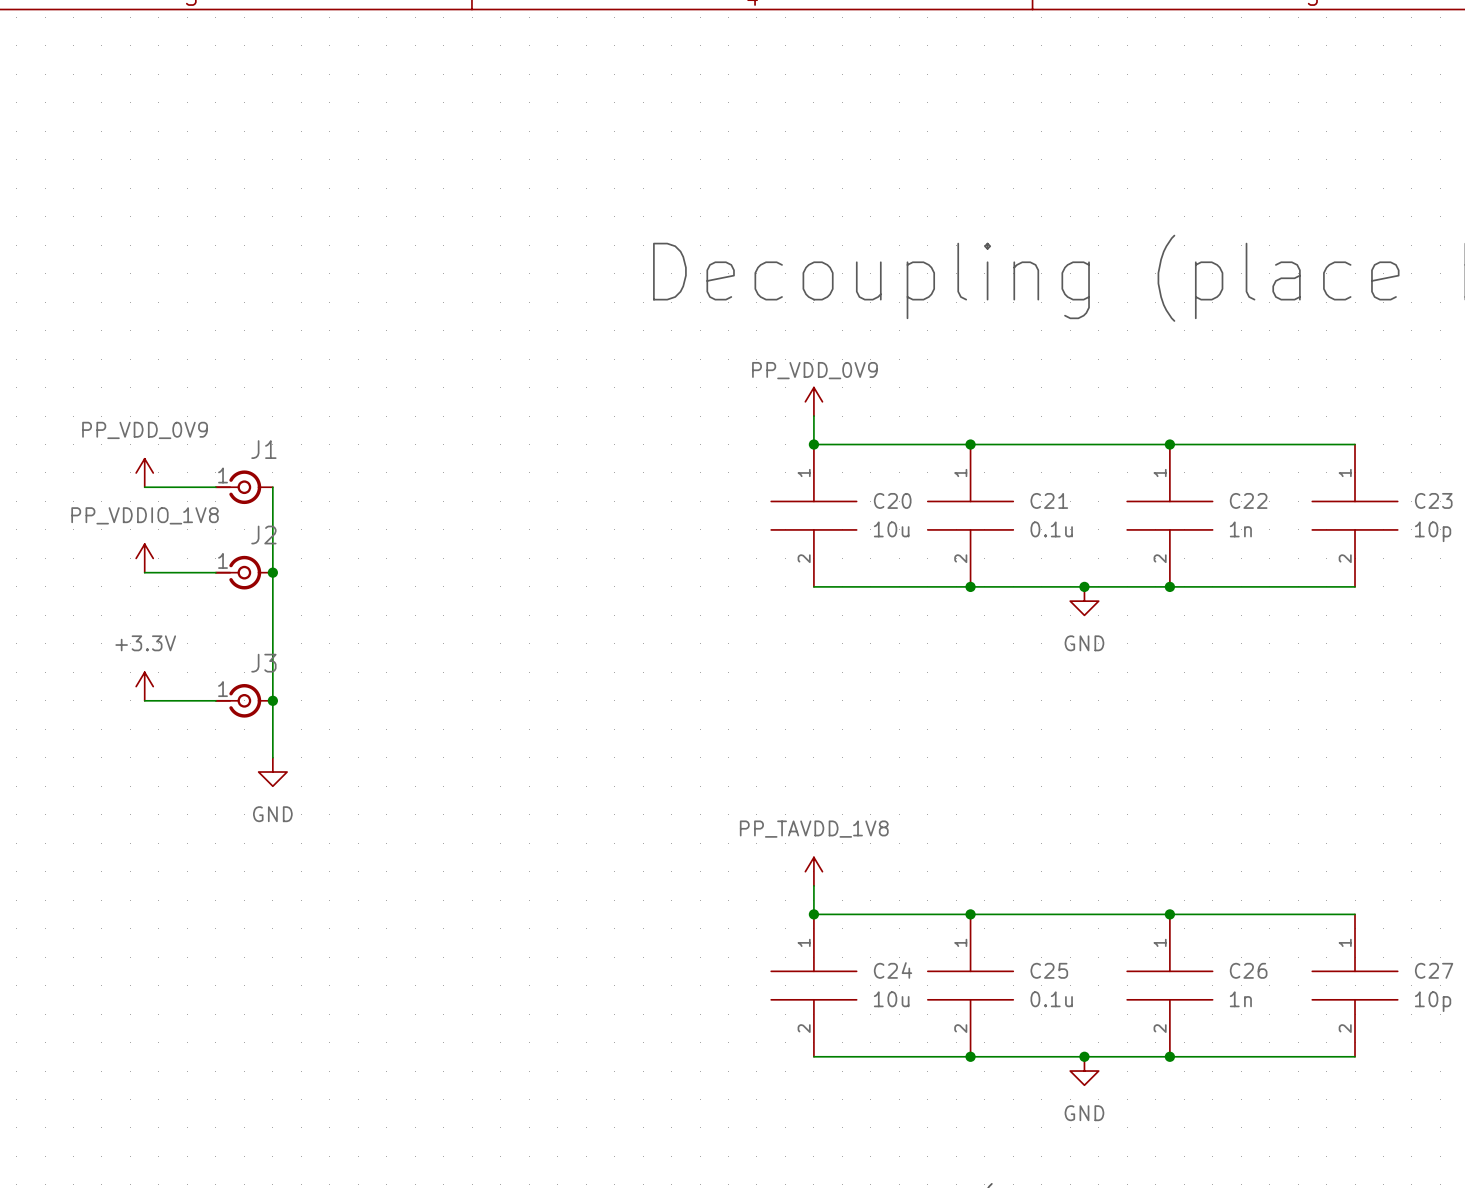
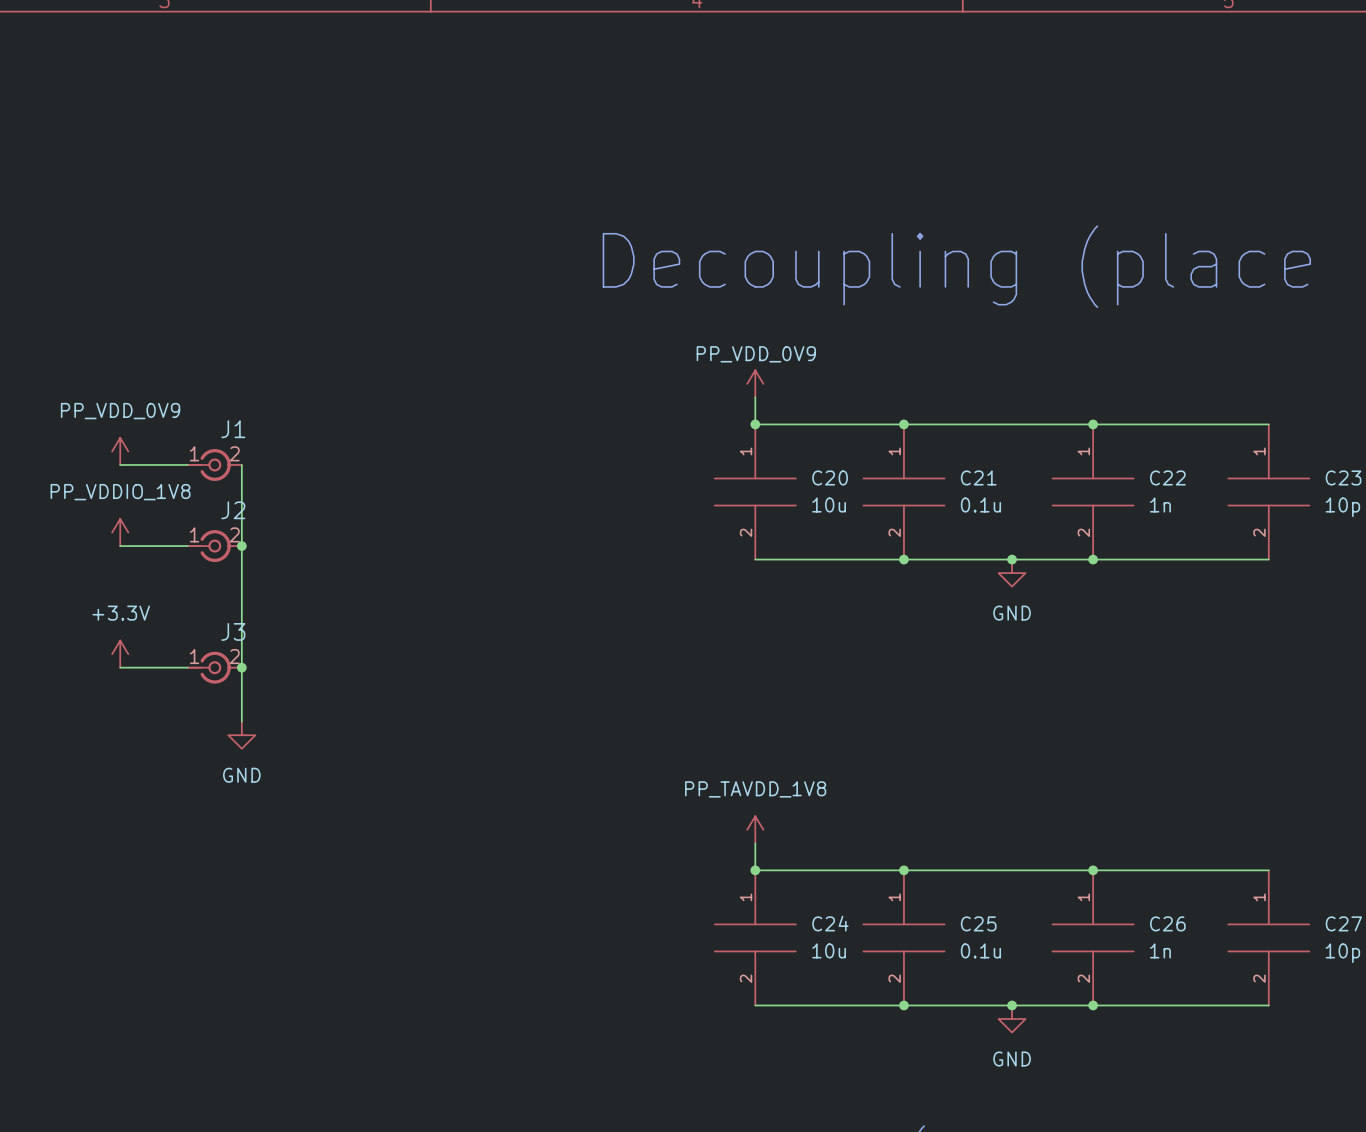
J1 pin number: none -> 2 (234, 453)
J2 pin number: none -> 2 (234, 534)
J3 pin number: none -> 2 (234, 656)

